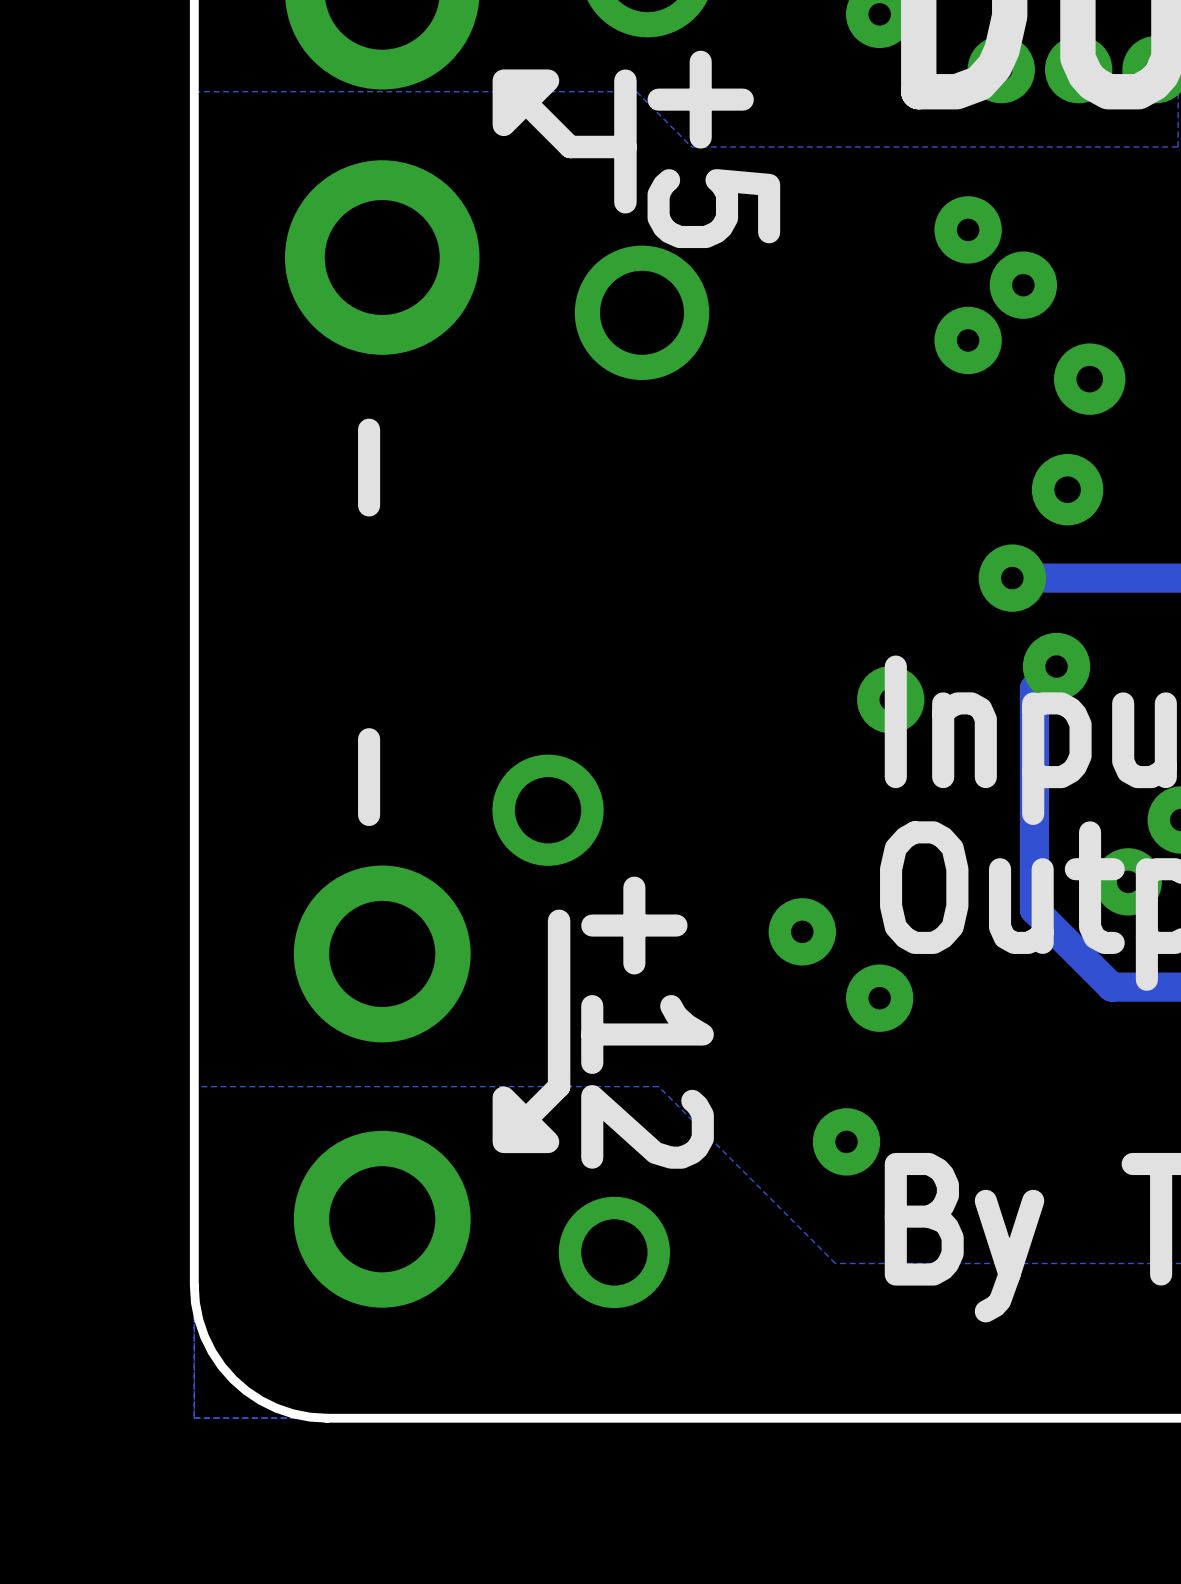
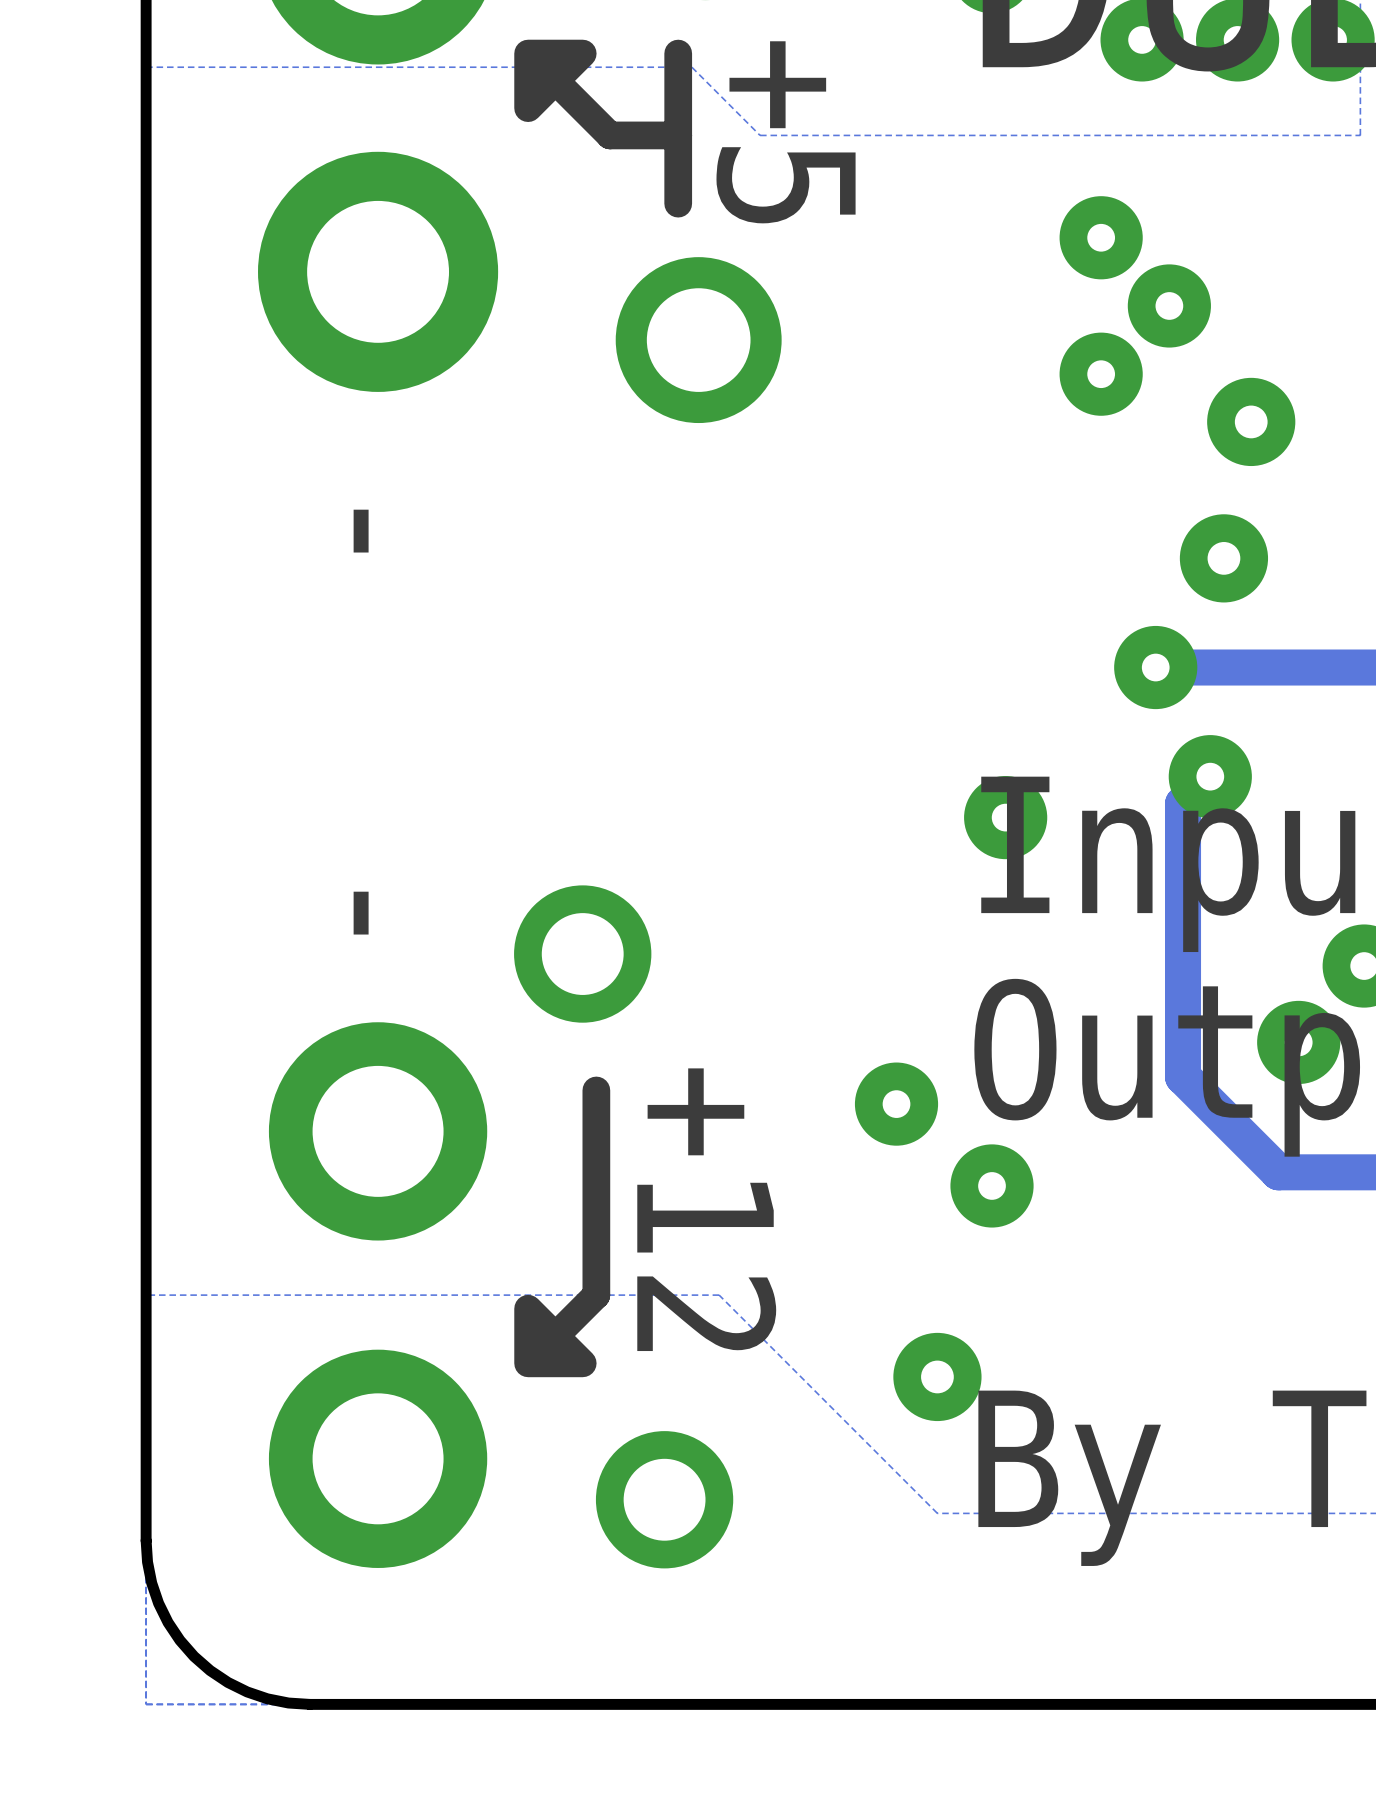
via position: (846, 1141) -> (937, 1376)

